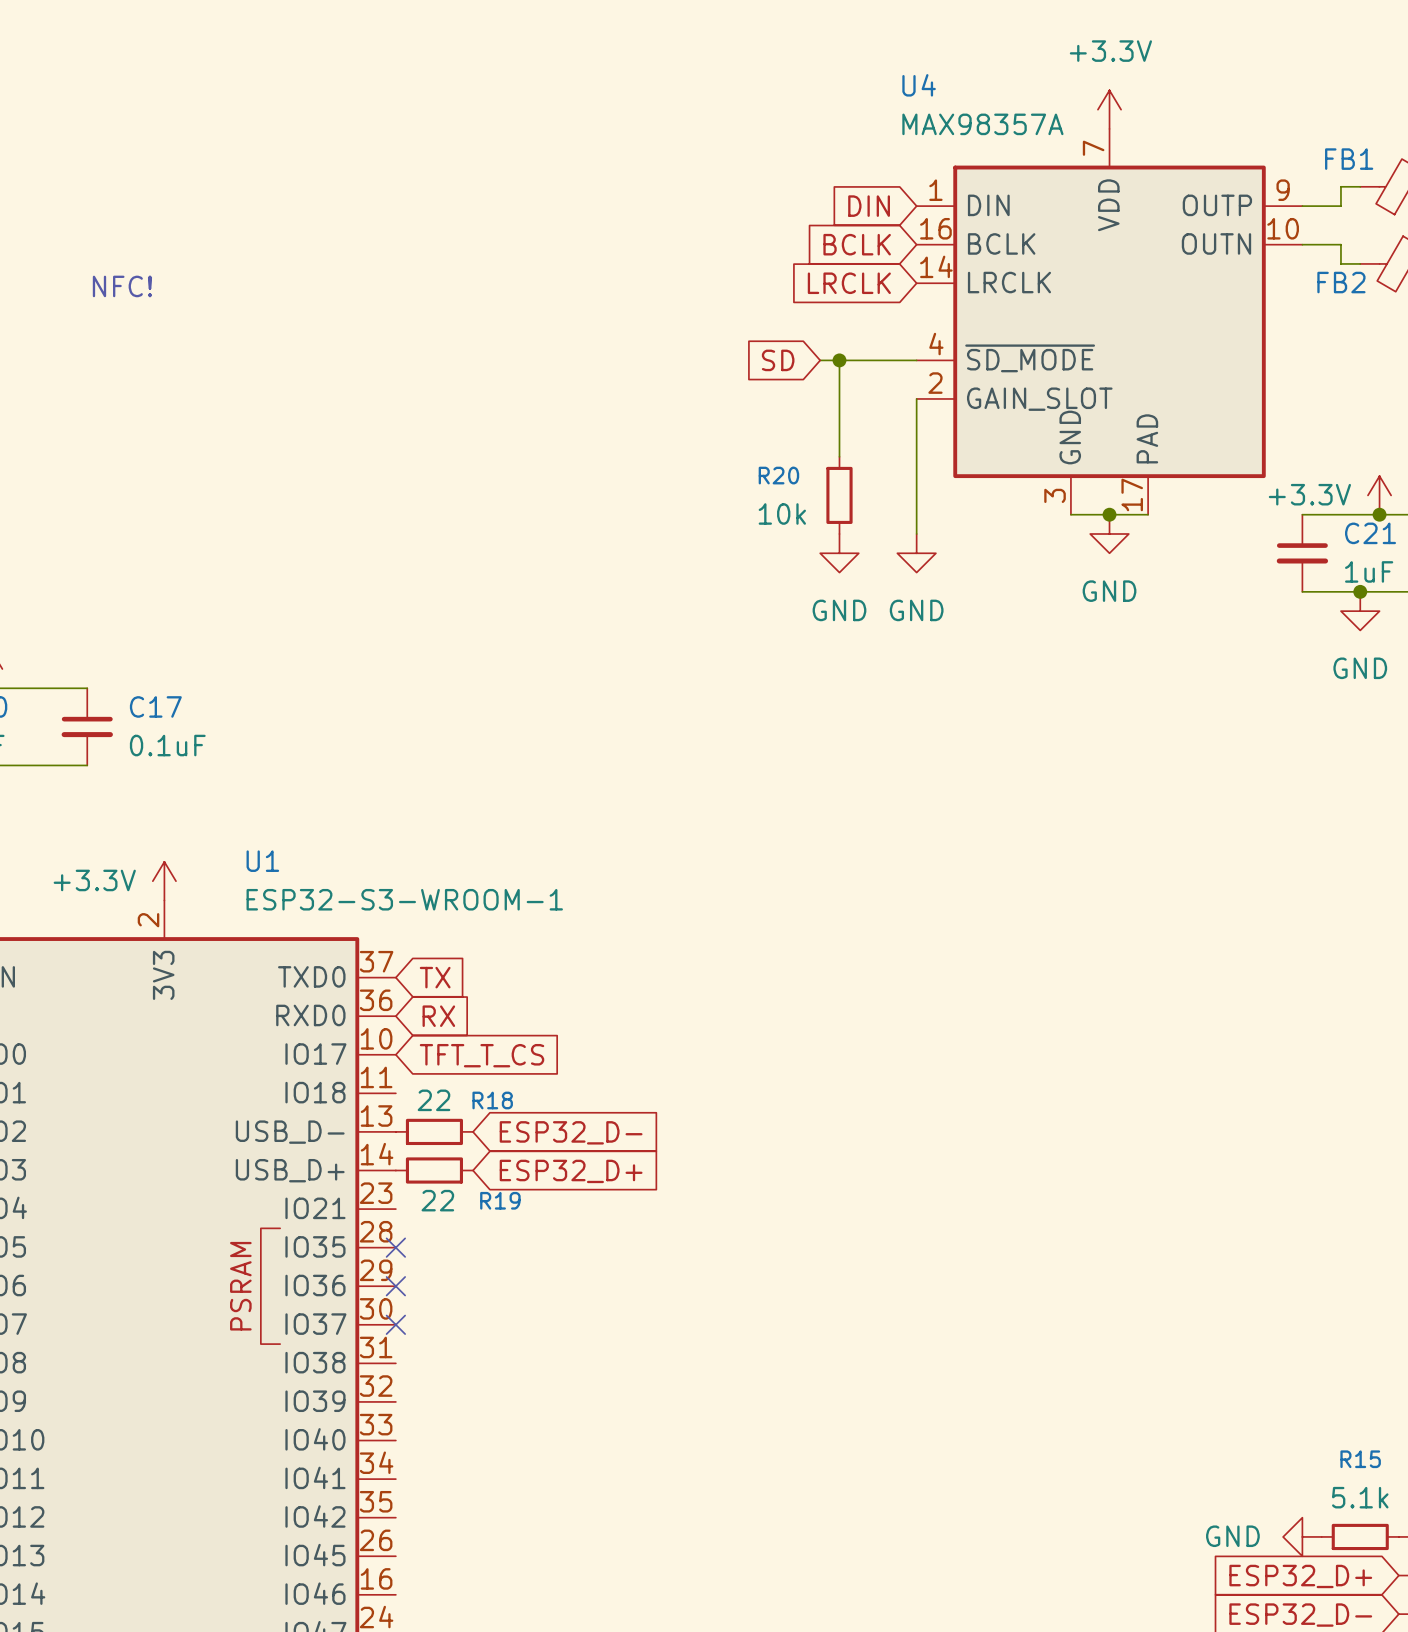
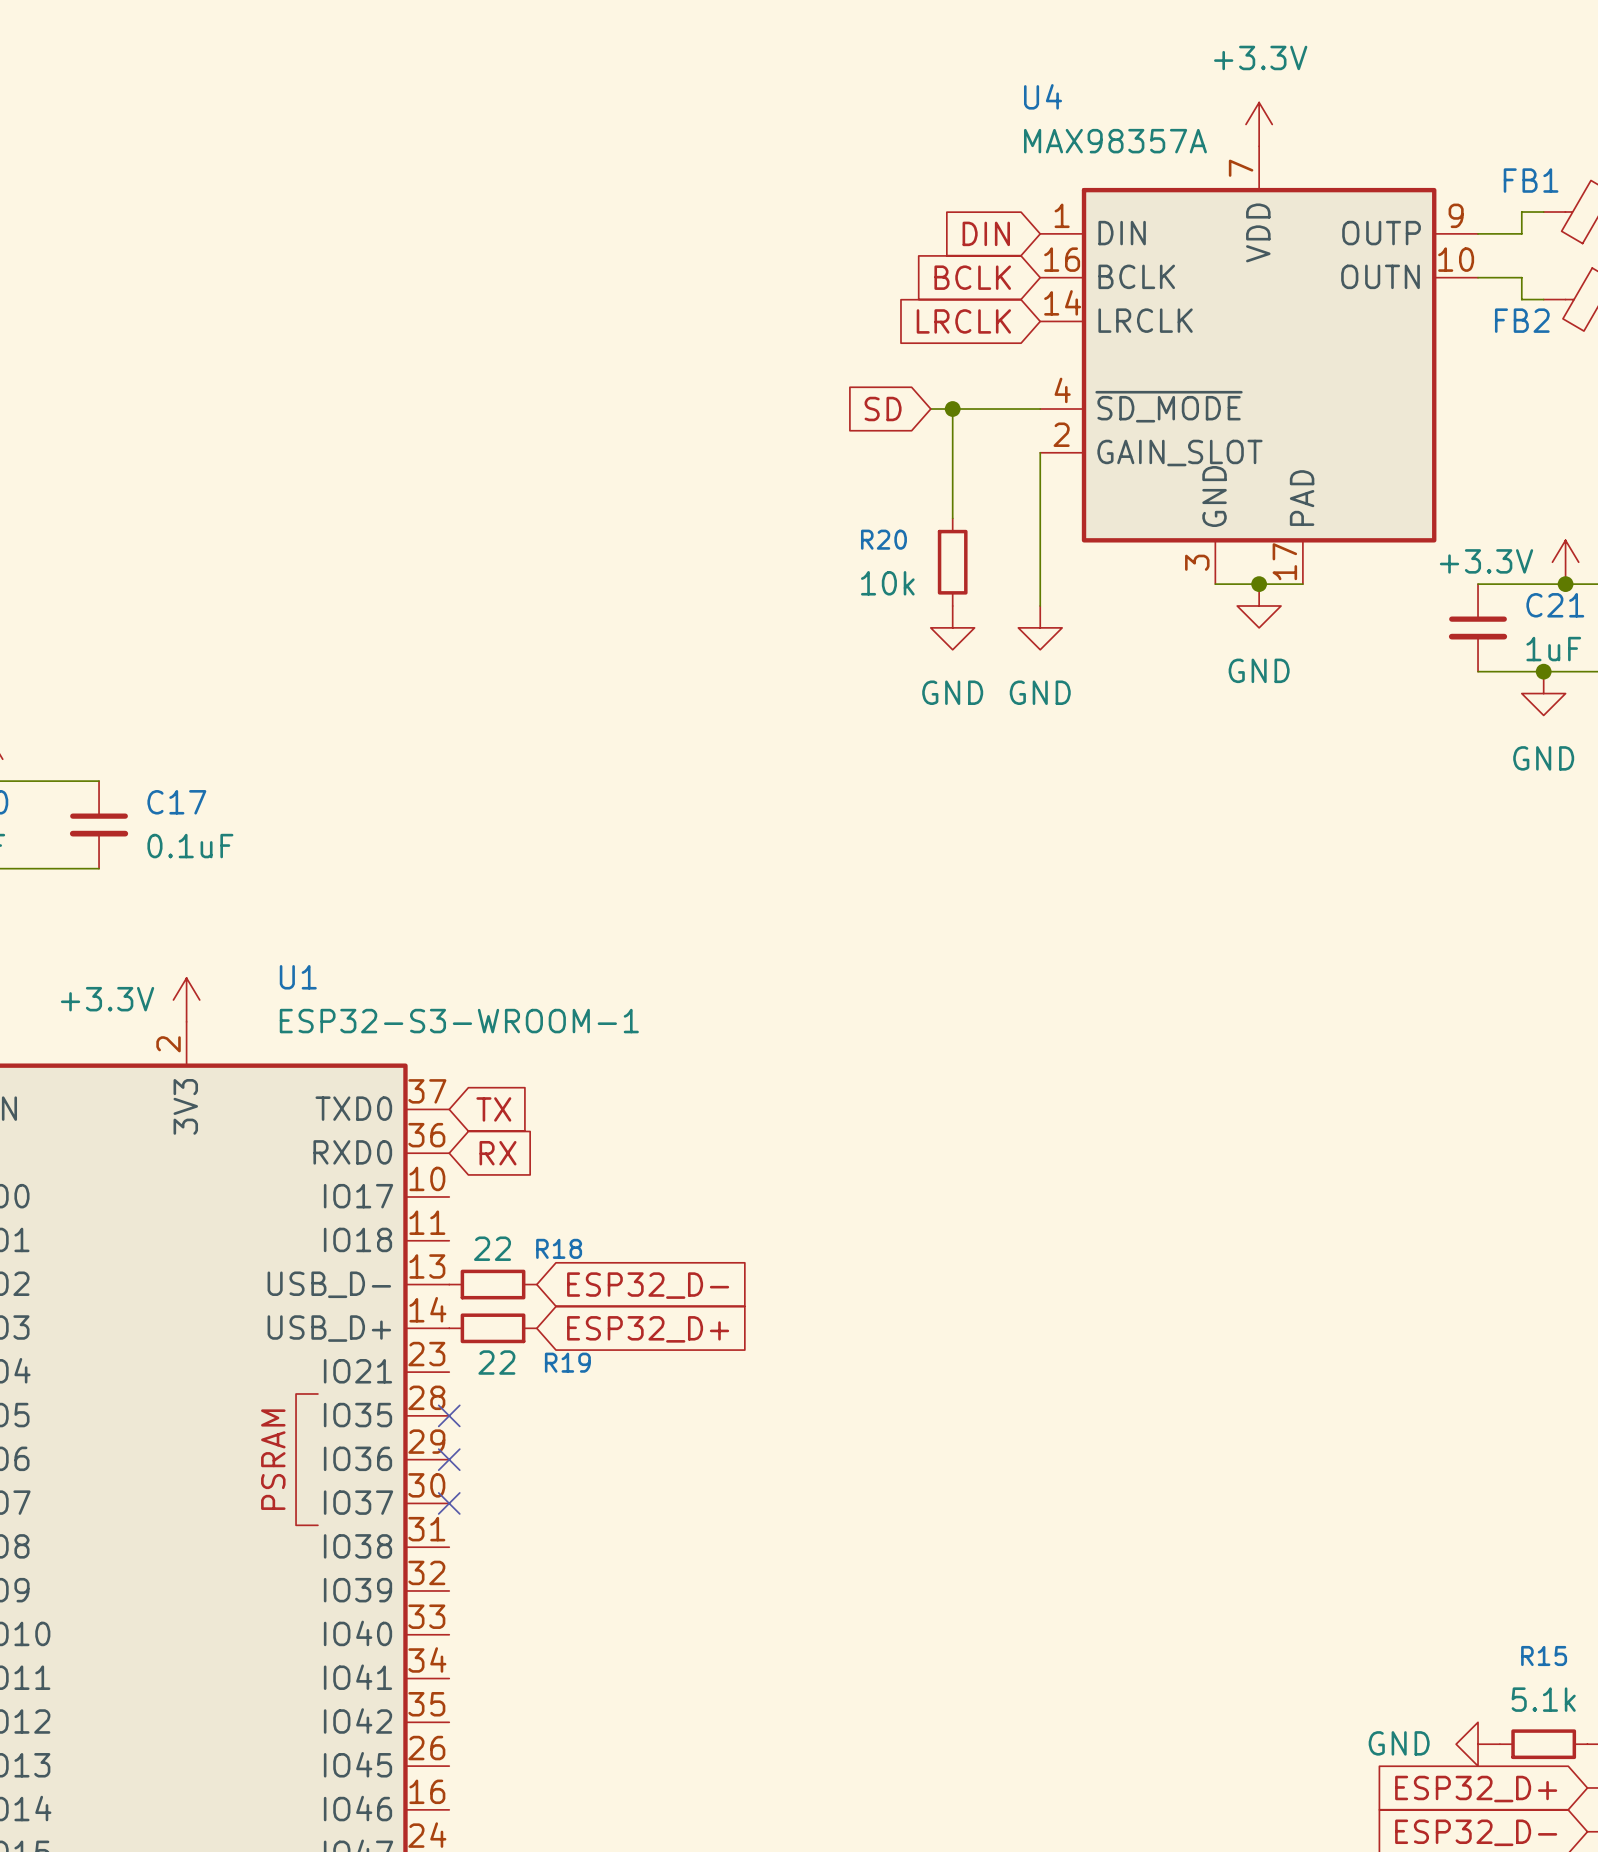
text: NFC! (122, 286) -> none
global label: TFT_T_CS (482, 1055) -> none

